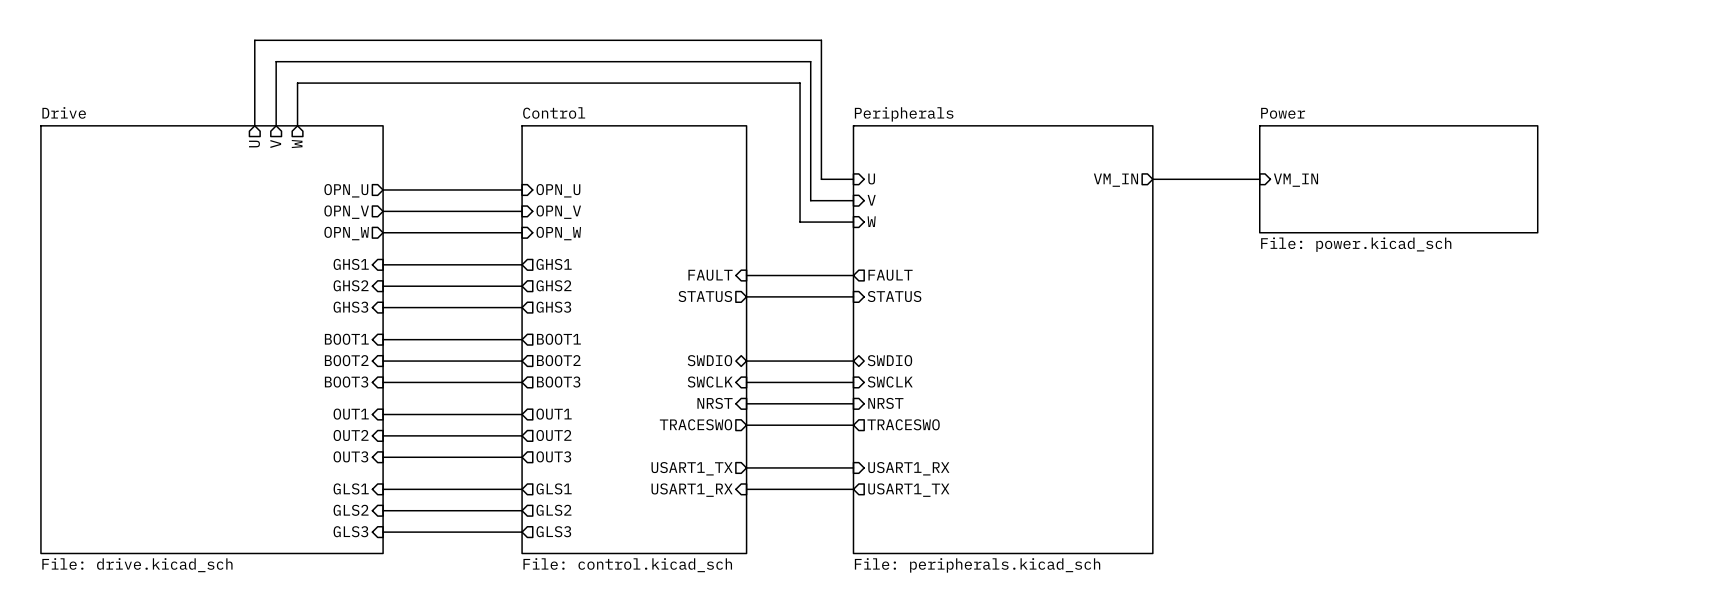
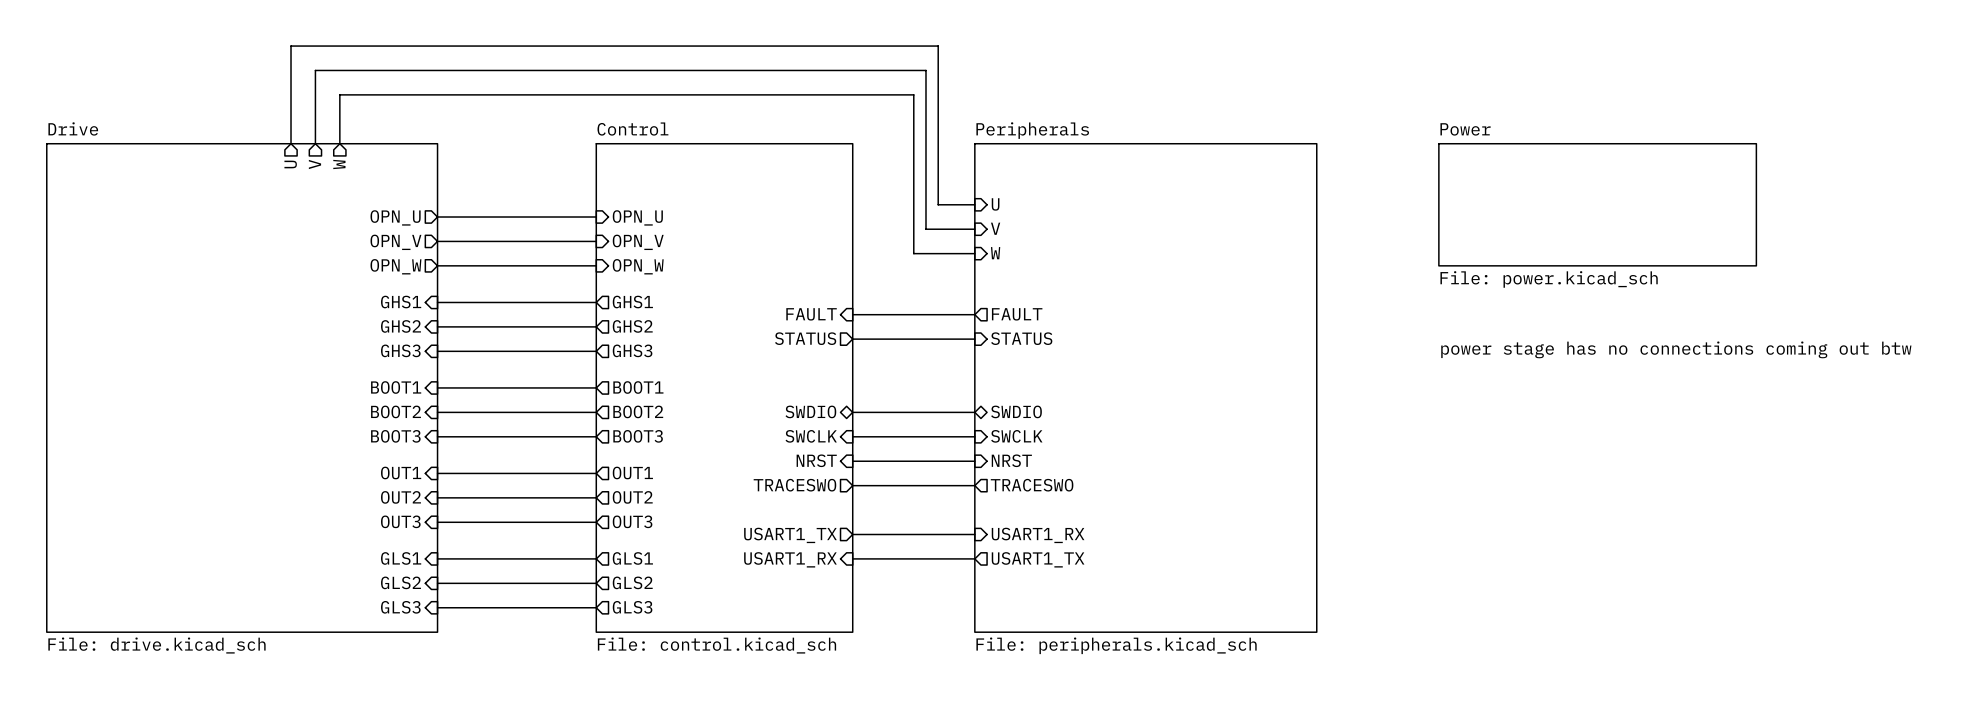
wire: (1152, 179) (1259, 179) -> none
sheet pin: VM_IN (1115, 180) -> none
sheet pin: VM_IN (1295, 180) -> none
text: none -> power stage has no connections coming out btw (1676, 349)

